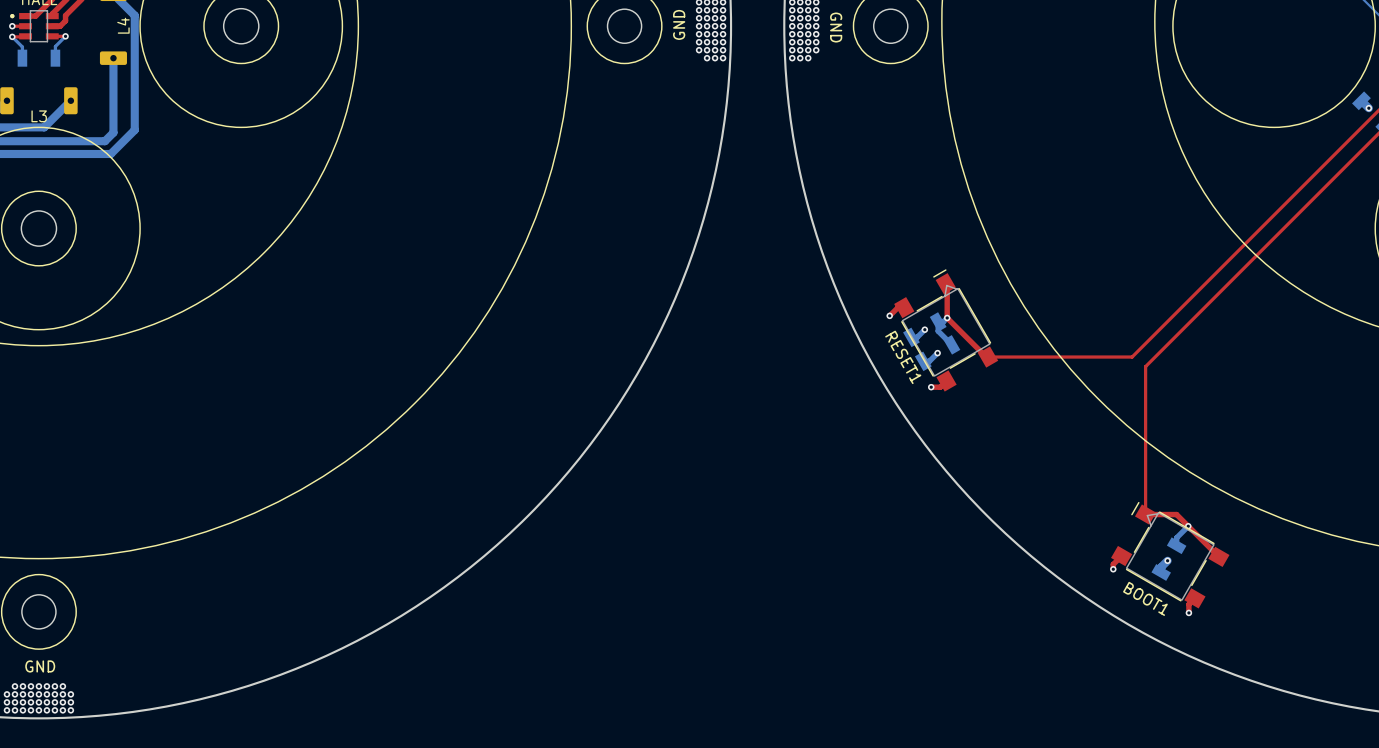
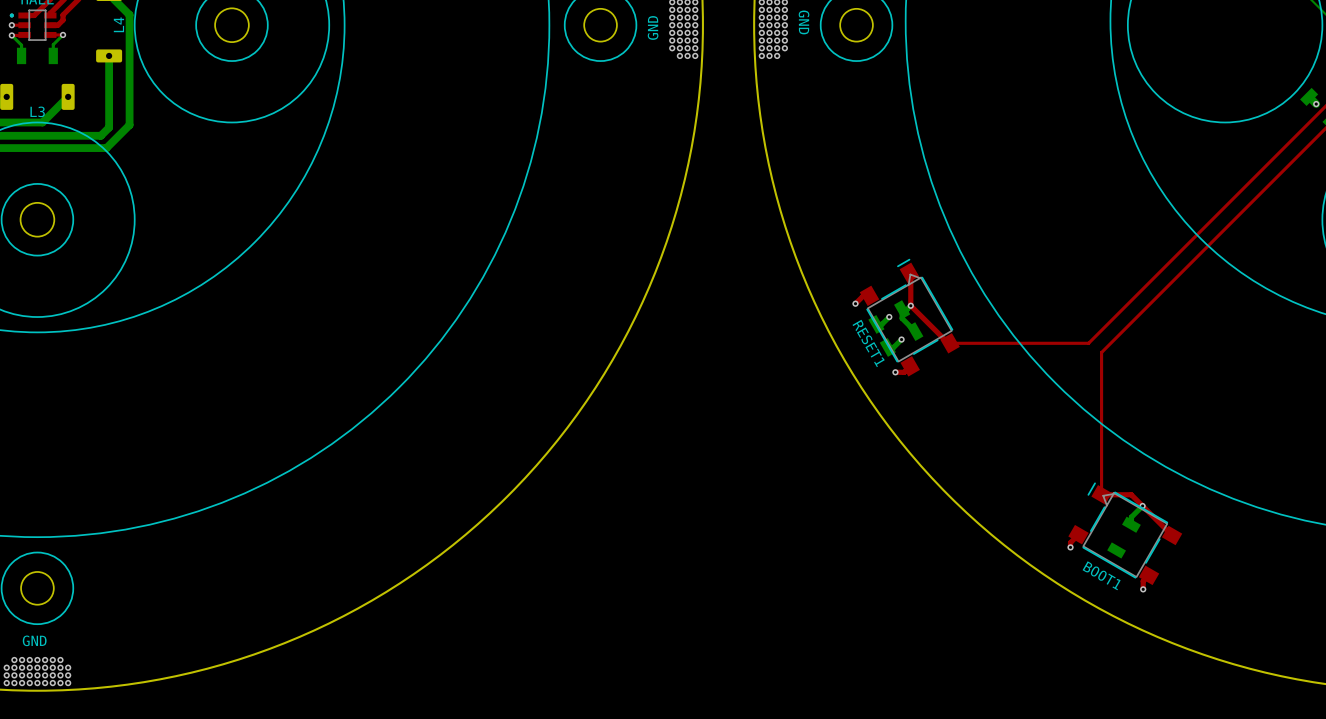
bottom track: (1167, 560) (1161, 567) (1161, 572) -> none
via: (1167, 560) -> none

